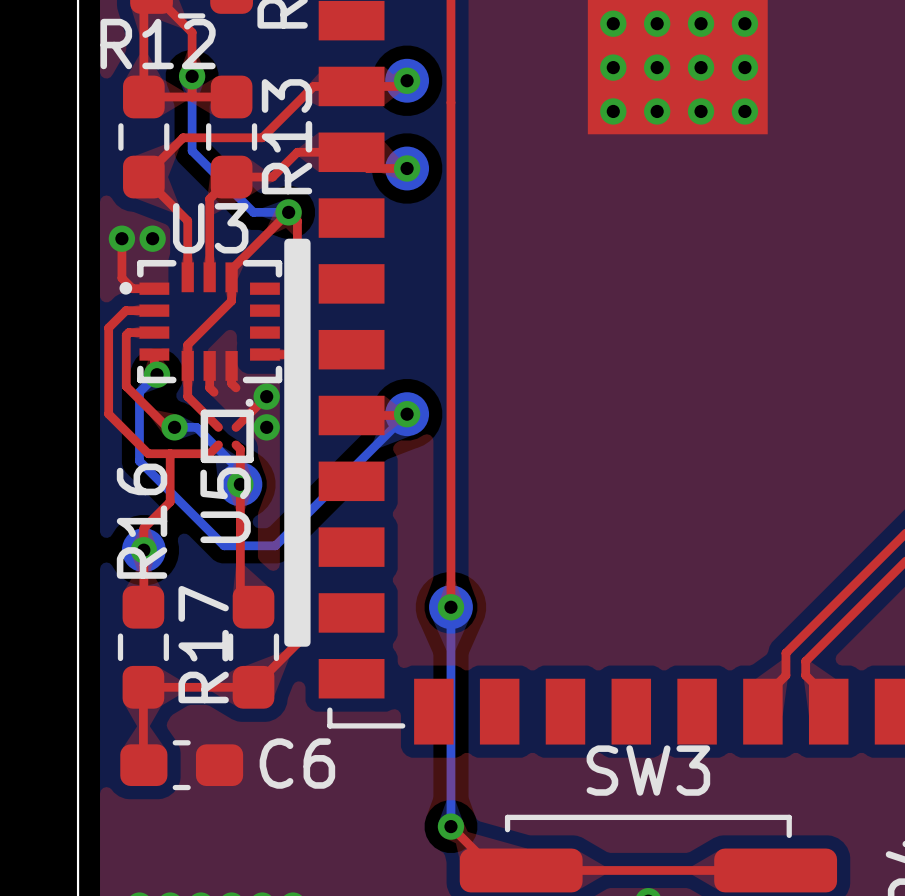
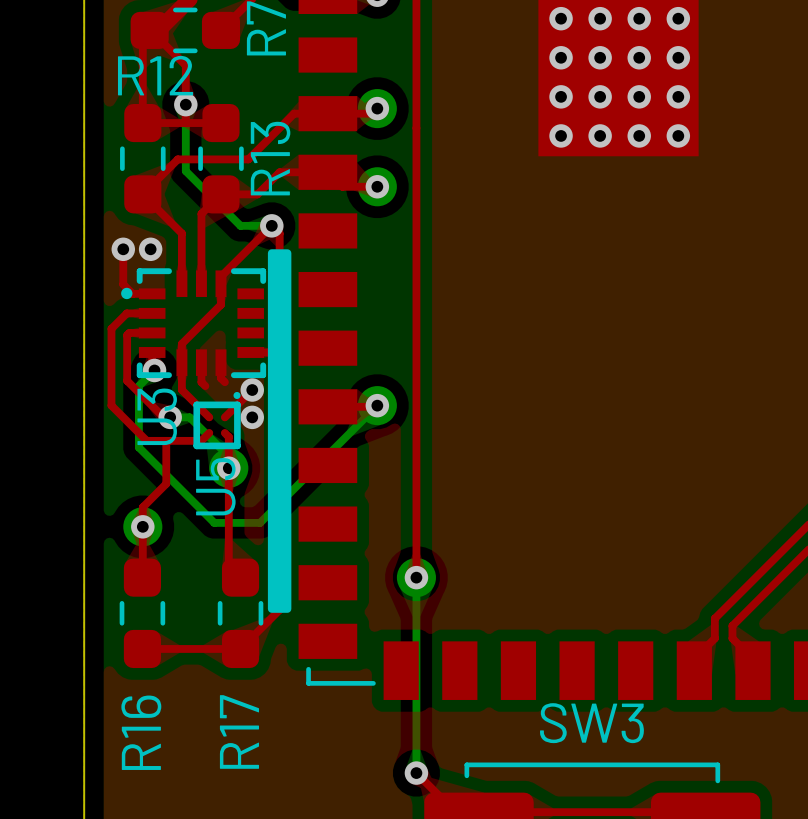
U3 name rotation: 0° (210, 228) -> 90° counterclockwise (157, 416)
U3 name position: U3 (210, 228) -> U3 (157, 416)
R16 name position: R16 (142, 521) -> R16 (141, 732)
R17 name position: R17 (203, 644) -> R17 (239, 731)
top track: (142, 687) (143, 764) -> none
C6: (181, 765) -> none

